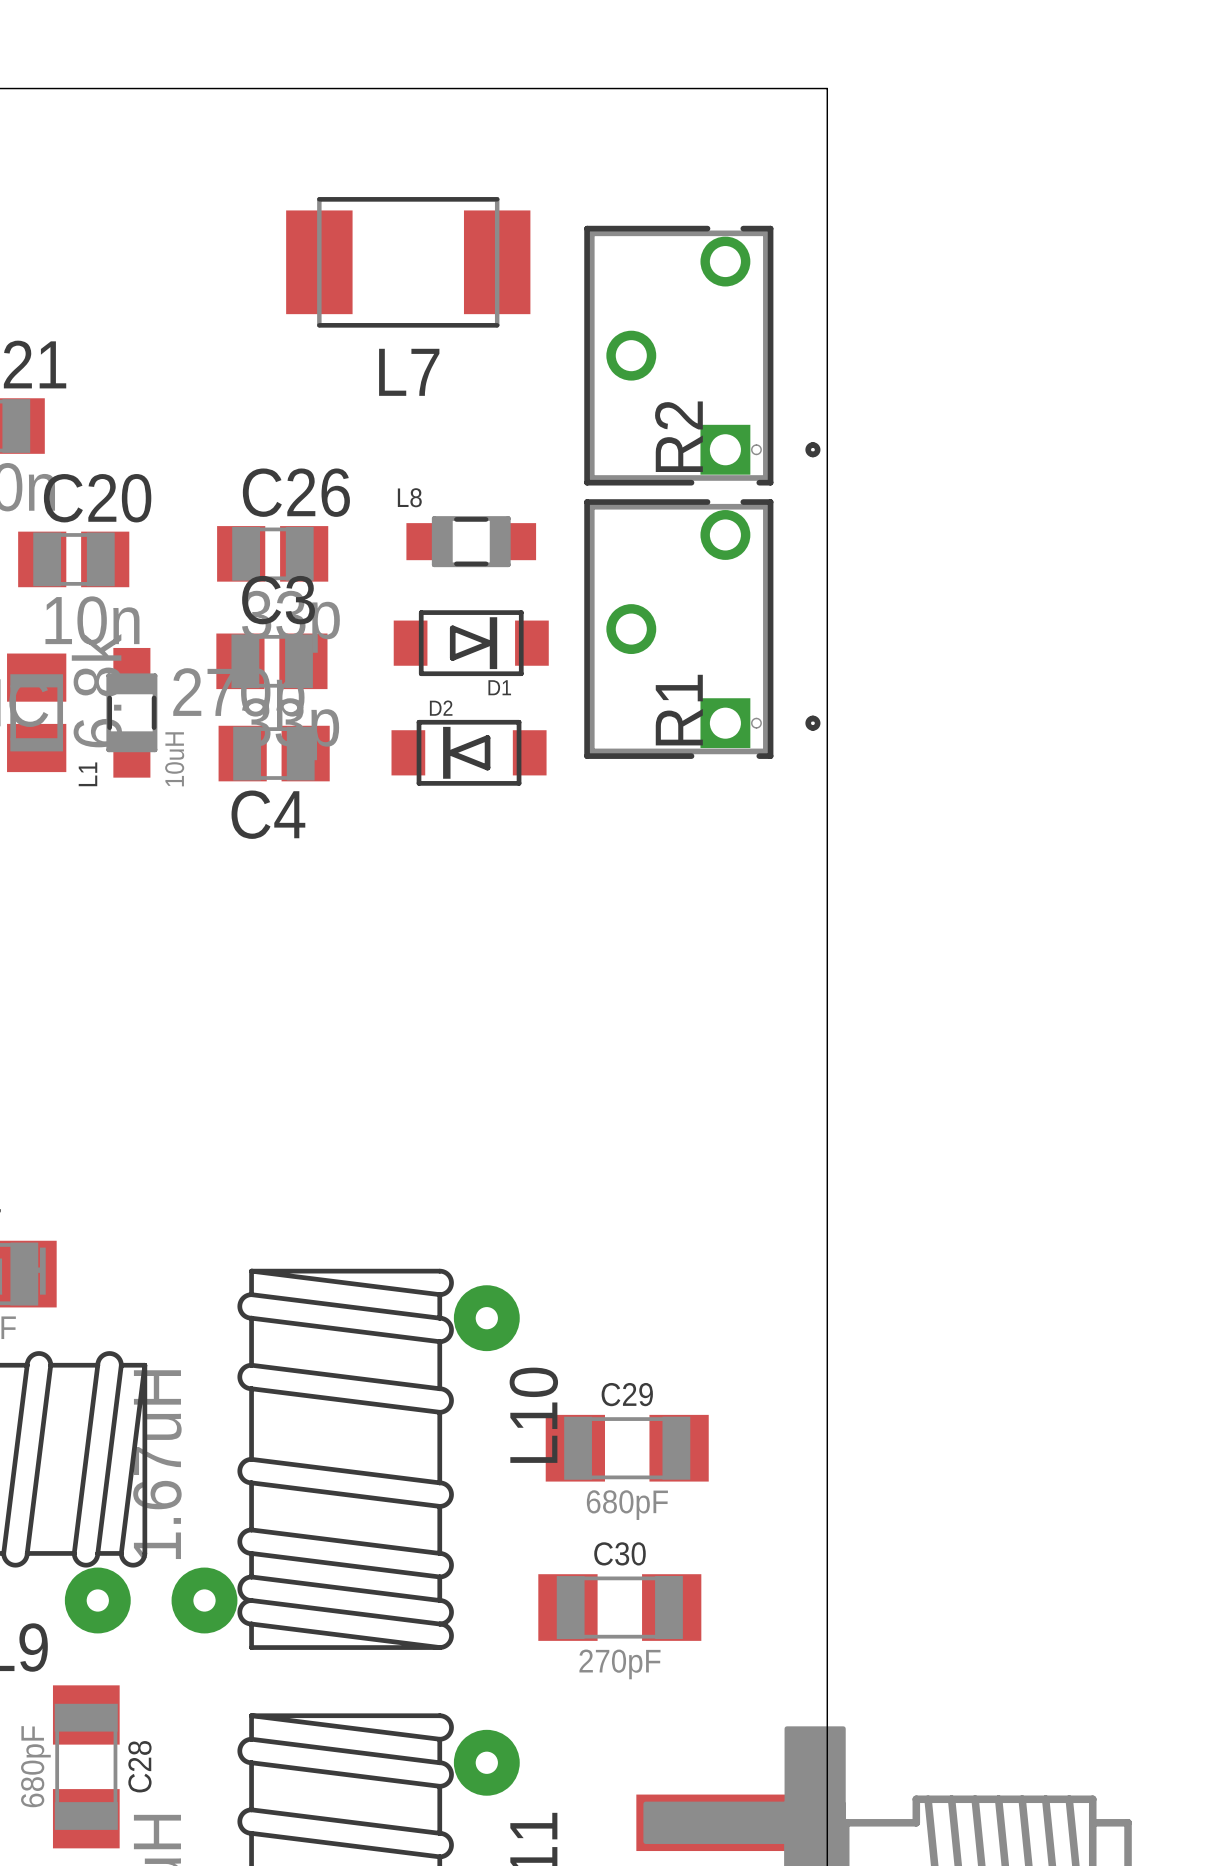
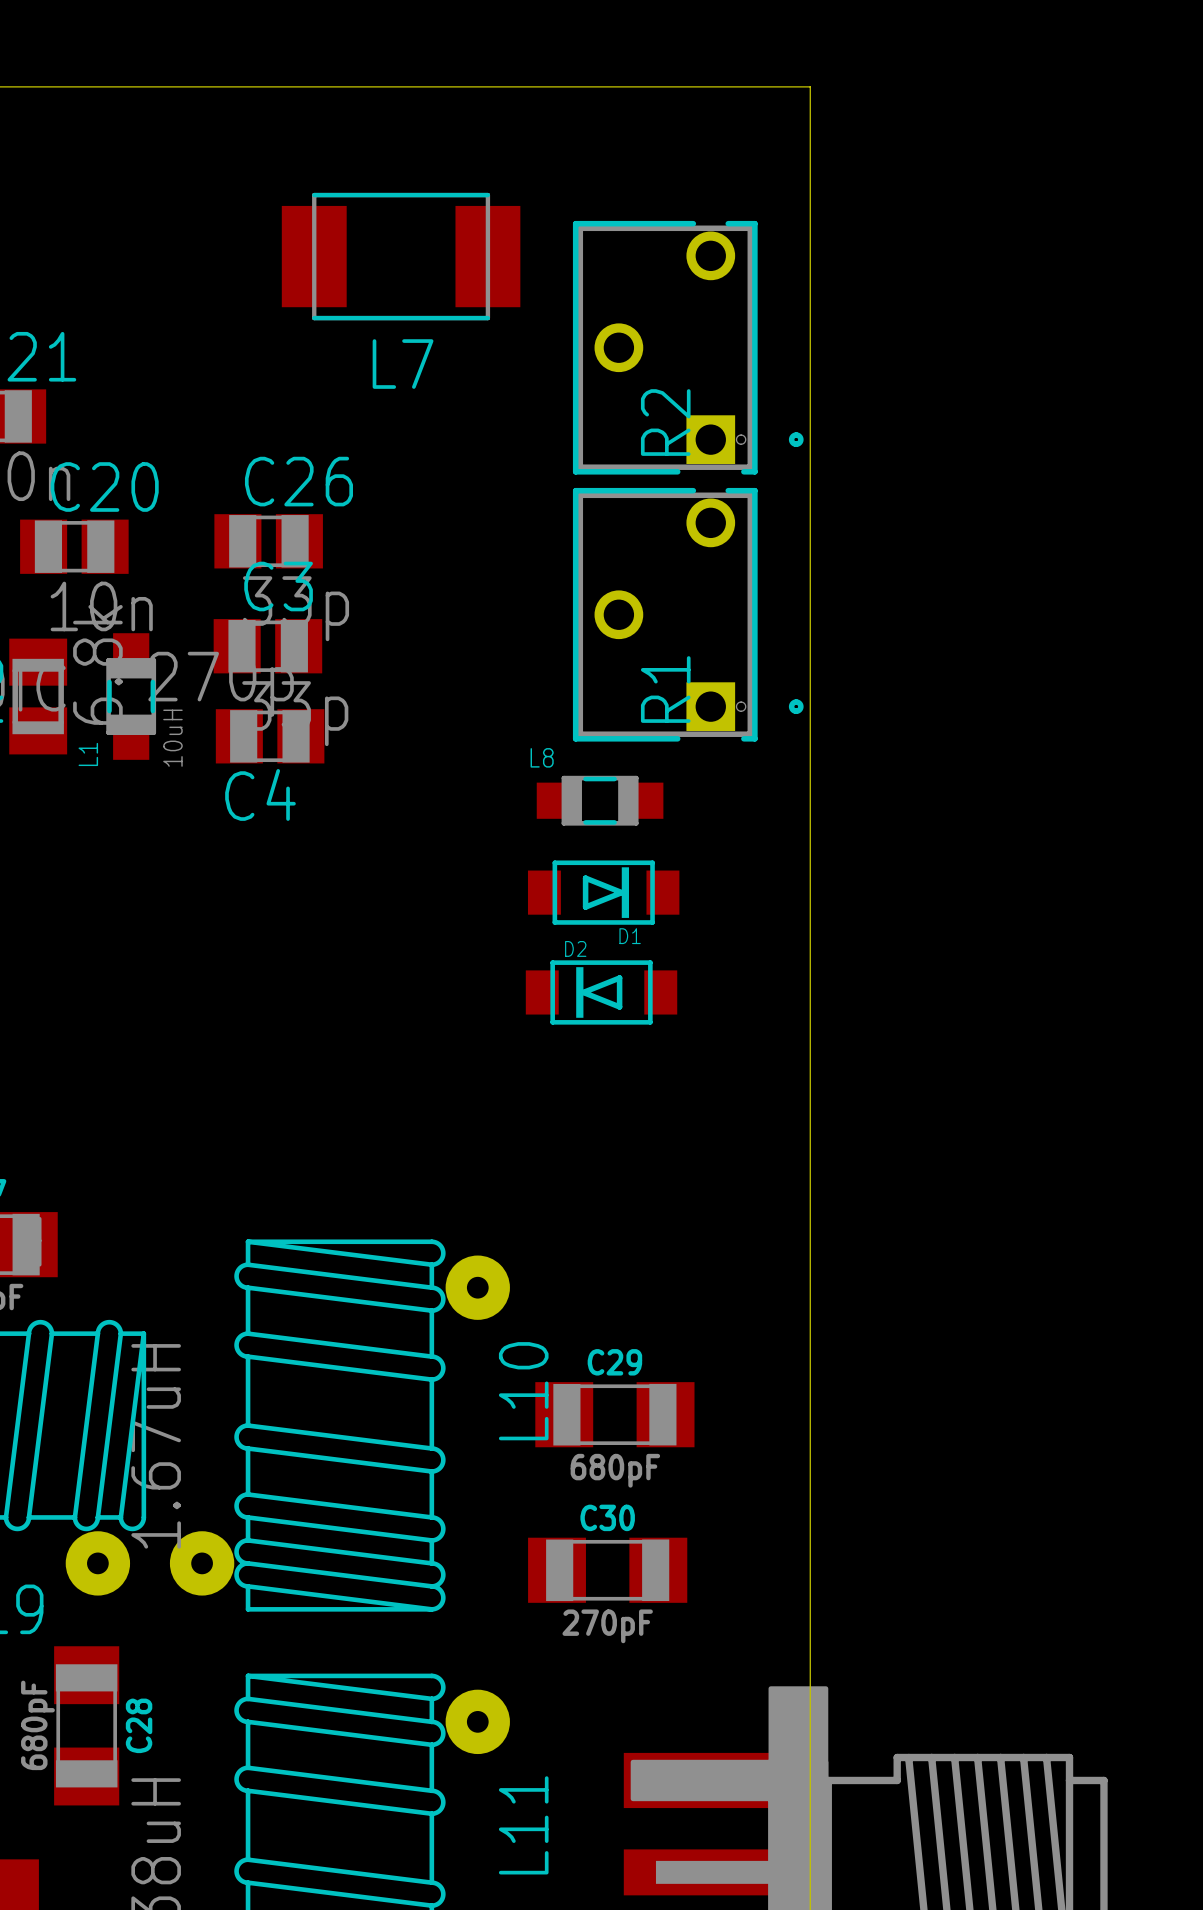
L8 position: (471, 541) -> (600, 800)
D1 position: (471, 643) -> (603, 892)
D2 position: (469, 752) -> (601, 992)

